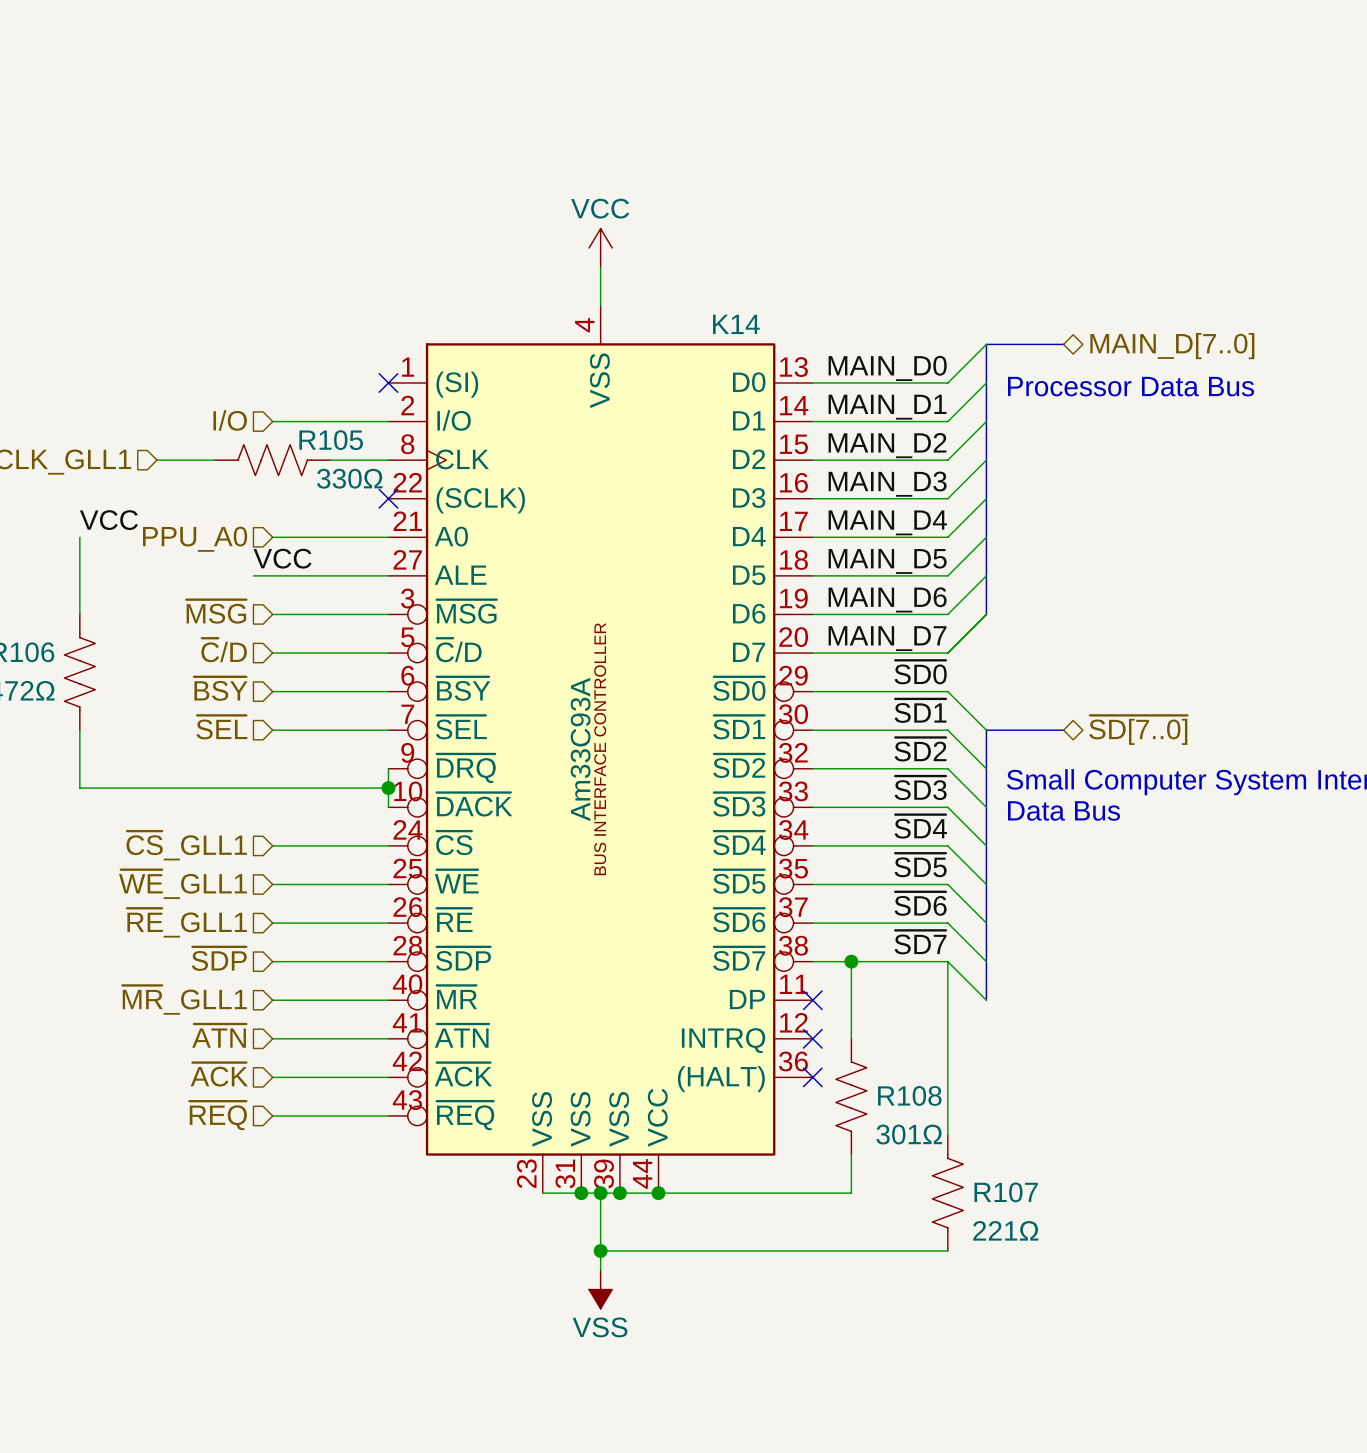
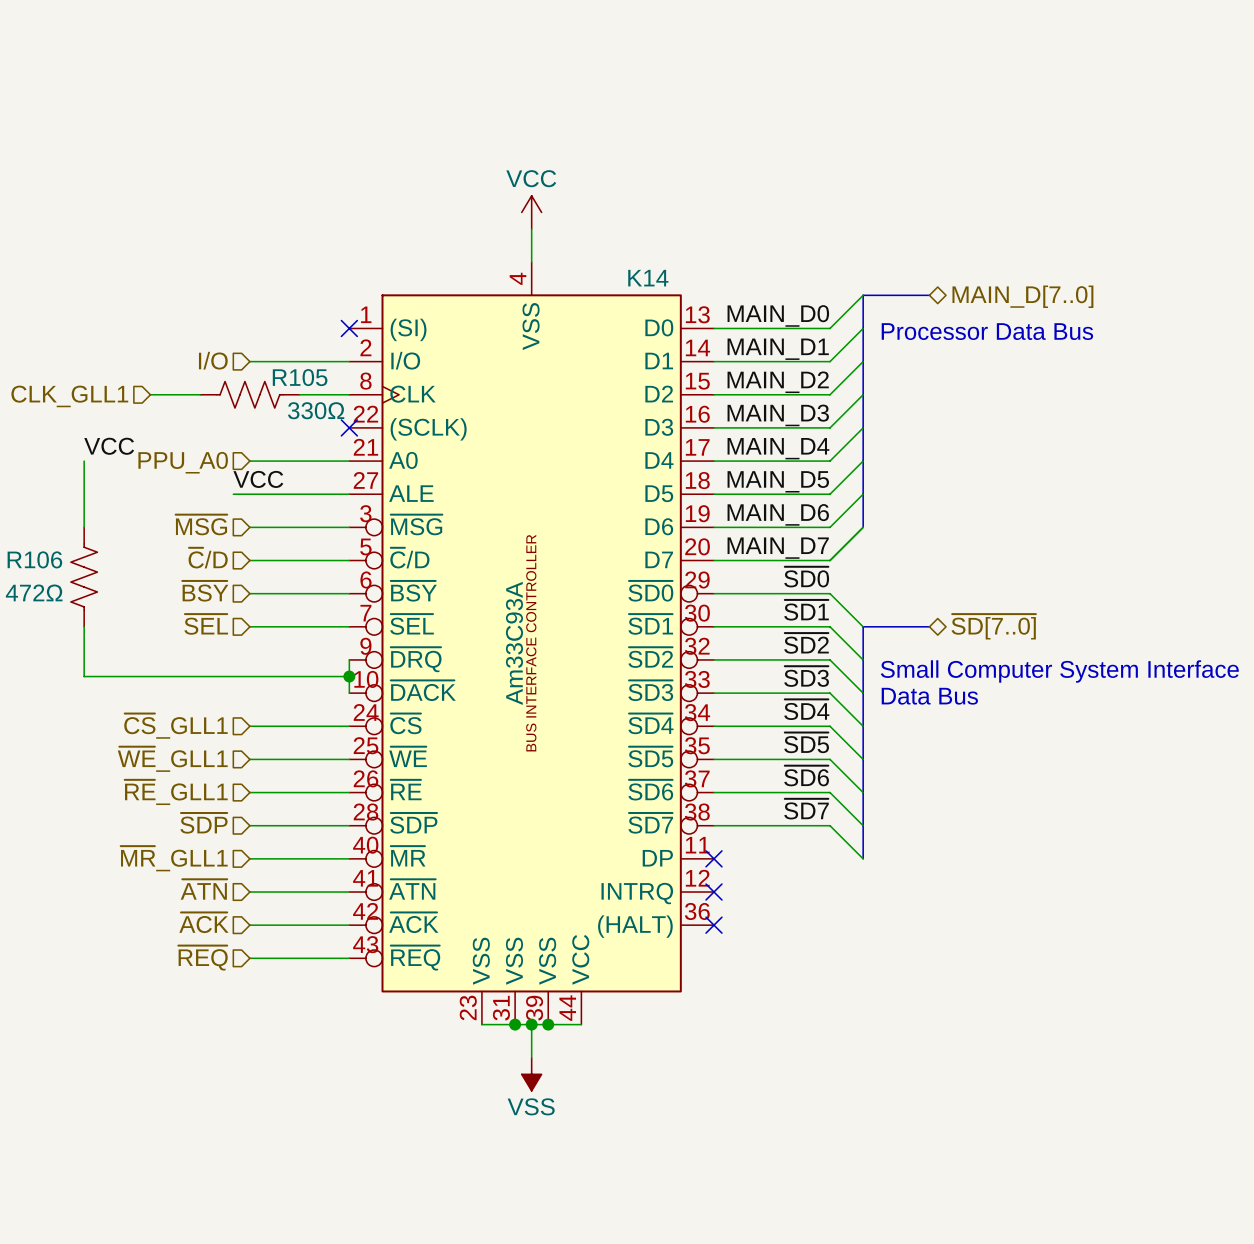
wire: (851, 961) (851, 1038) -> none
junction: (851, 961) -> none
wire: (947, 961) (947, 1135) -> none
R108: 301Ω (851, 1096) -> none
wire: (851, 1154) (851, 1193) (658, 1193) -> none
junction: (658, 1193) -> none
R107: 221Ω (947, 1193) -> none
wire: (600, 1250) (947, 1250) -> none
junction: (600, 1250) -> none
power symbol position: VSS (600, 1289) -> VSS (531, 1074)

